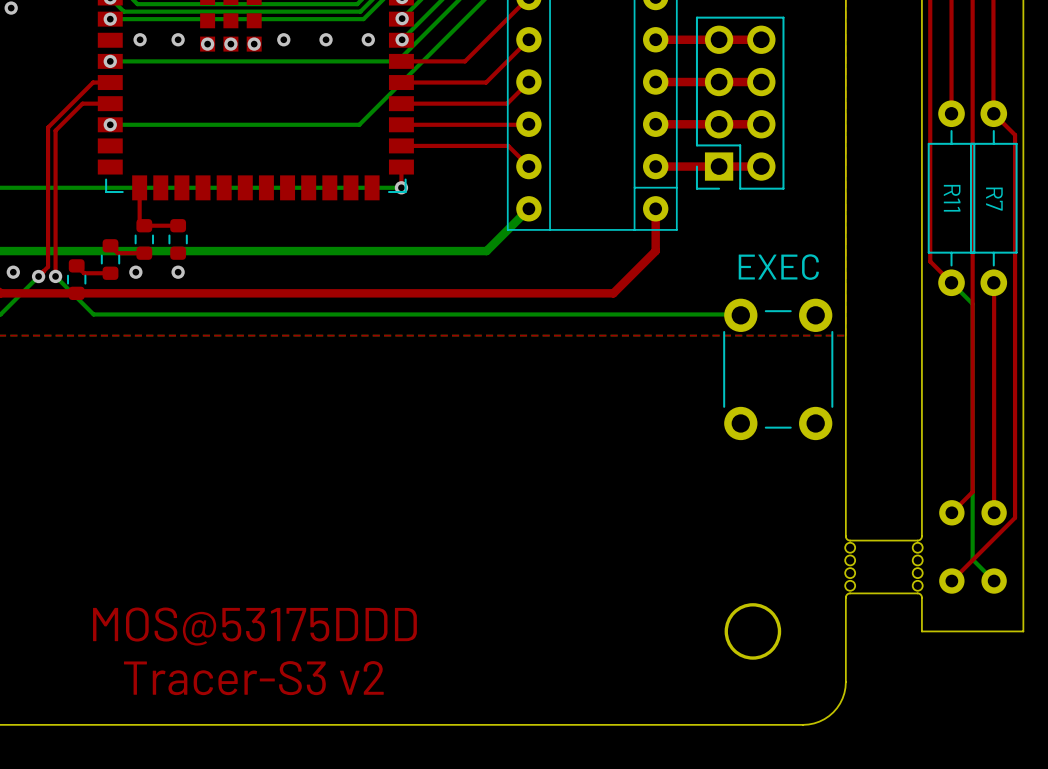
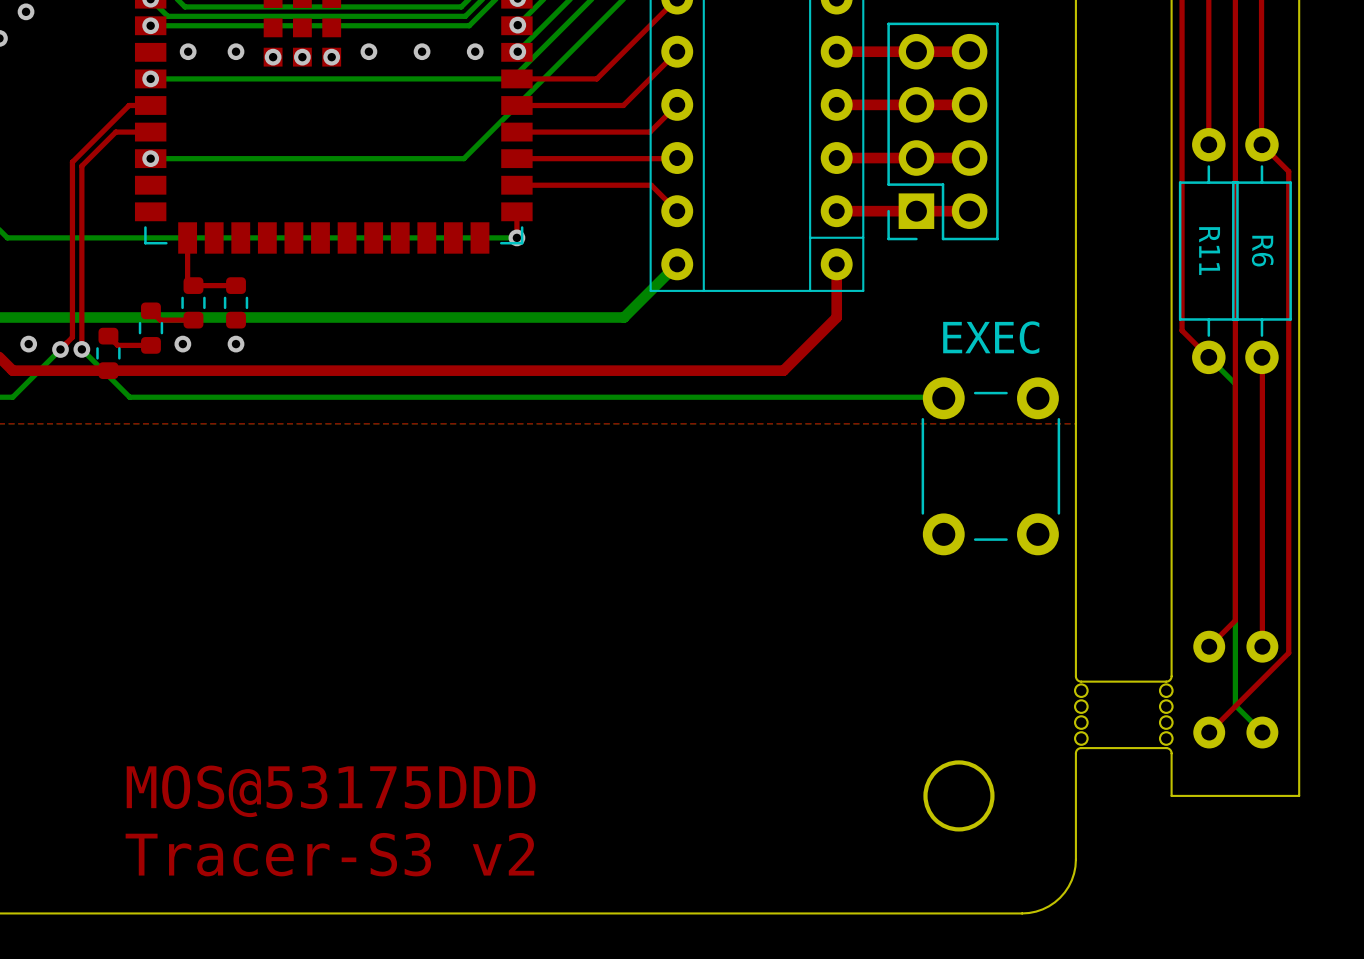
R7 name: R7 (994, 199) -> R6 (1262, 251)

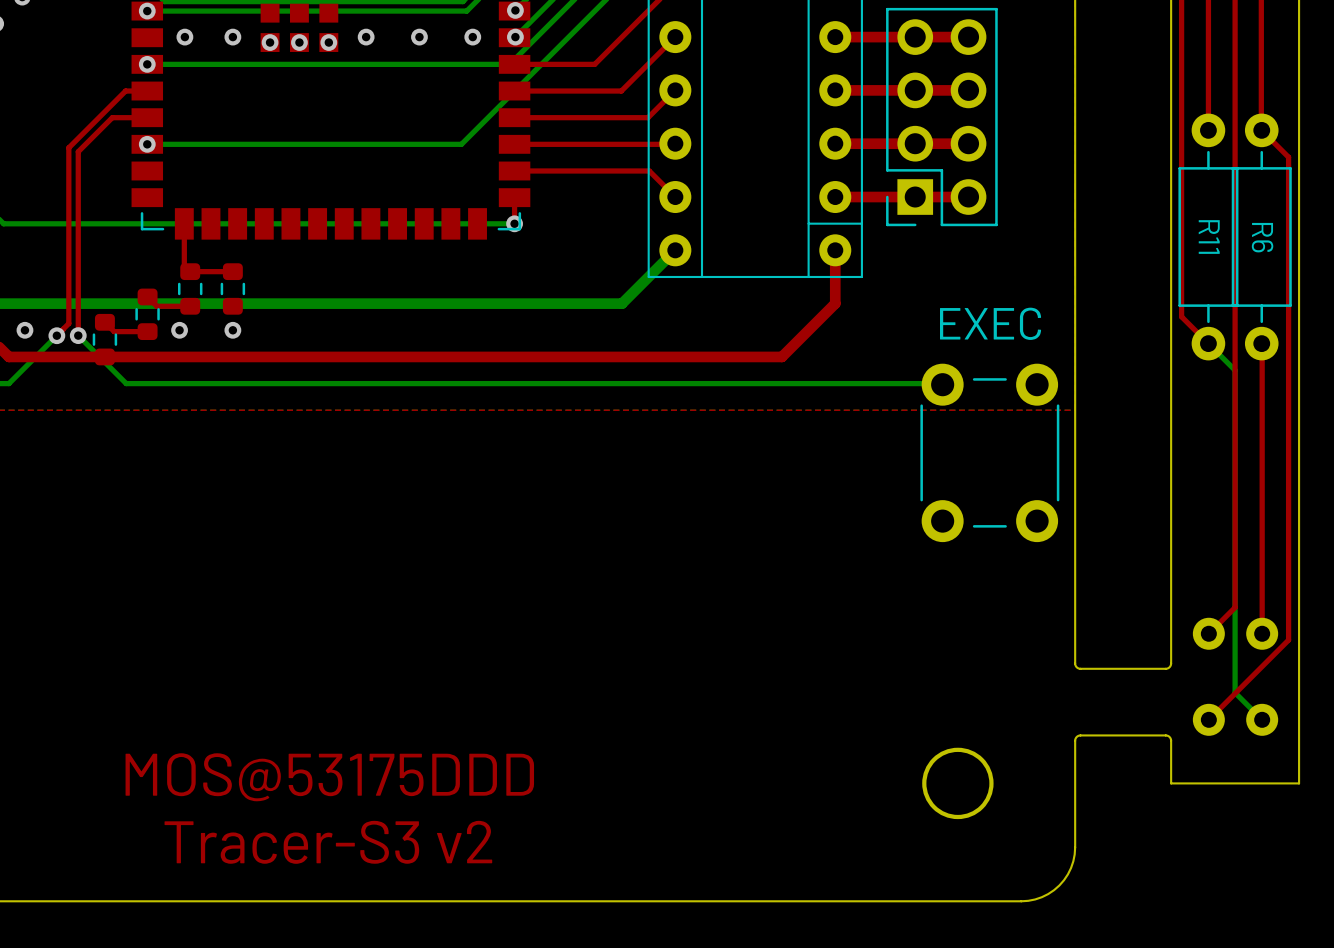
round board edge: [1074, 683, 1089, 698] -> none
round board edge: [1158, 683, 1174, 698] -> none
round board edge: [1074, 699, 1089, 714] -> none
round board edge: [1158, 699, 1174, 714] -> none
round board edge: [1074, 715, 1089, 730] -> none
round board edge: [1158, 715, 1174, 730] -> none
round board edge: [1074, 731, 1089, 746] -> none
round board edge: [1158, 731, 1174, 746] -> none

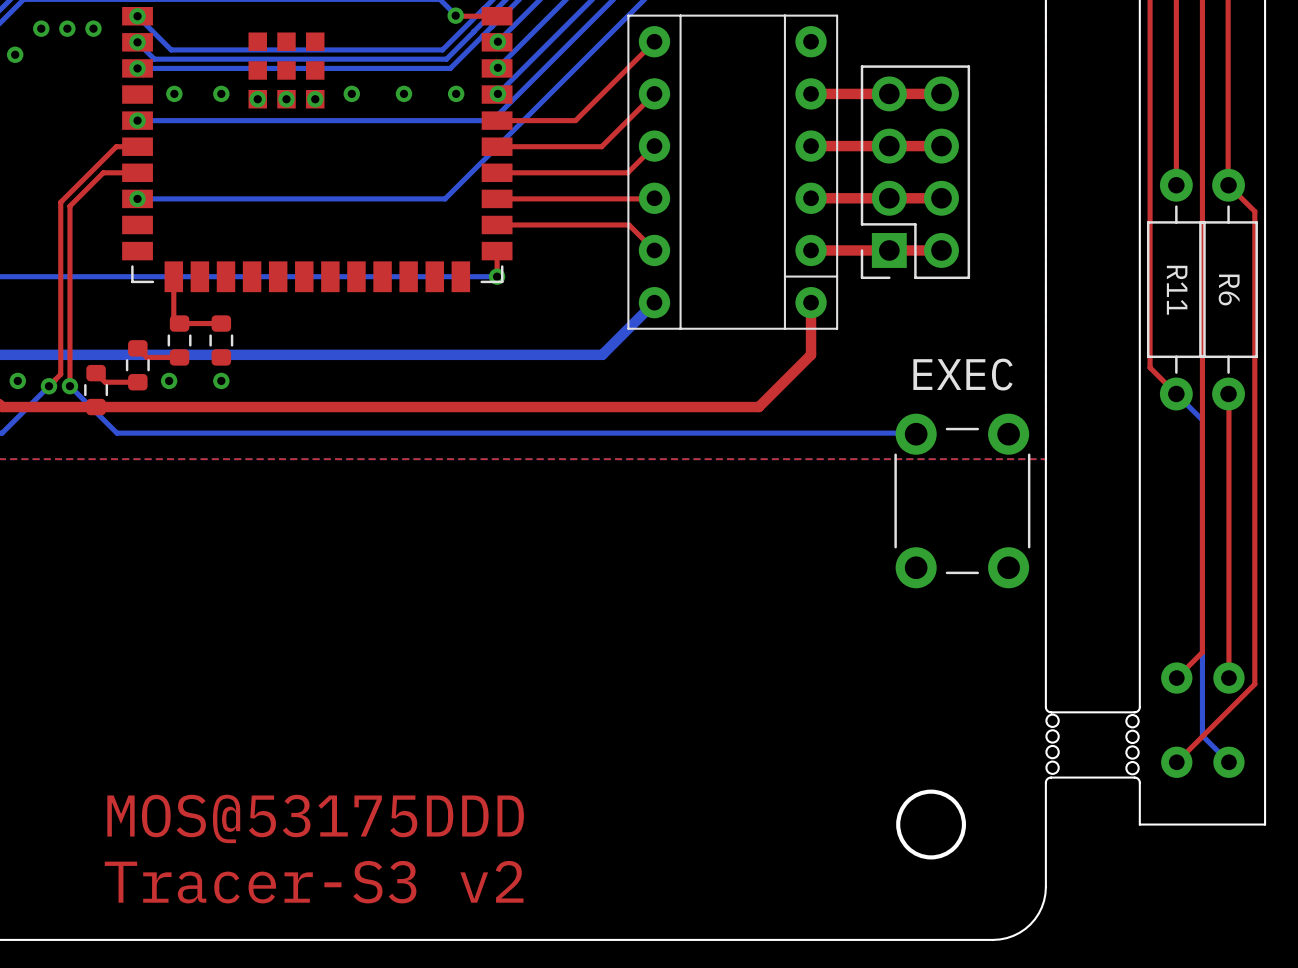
round board edge: none -> [1045, 713, 1060, 728]
round board edge: none -> [1125, 714, 1140, 729]
round board edge: none -> [1045, 729, 1060, 744]
round board edge: none -> [1125, 729, 1140, 745]
round board edge: none -> [1045, 744, 1060, 760]
round board edge: none -> [1125, 745, 1140, 760]
round board edge: none -> [1045, 760, 1060, 775]
round board edge: none -> [1125, 760, 1140, 776]

